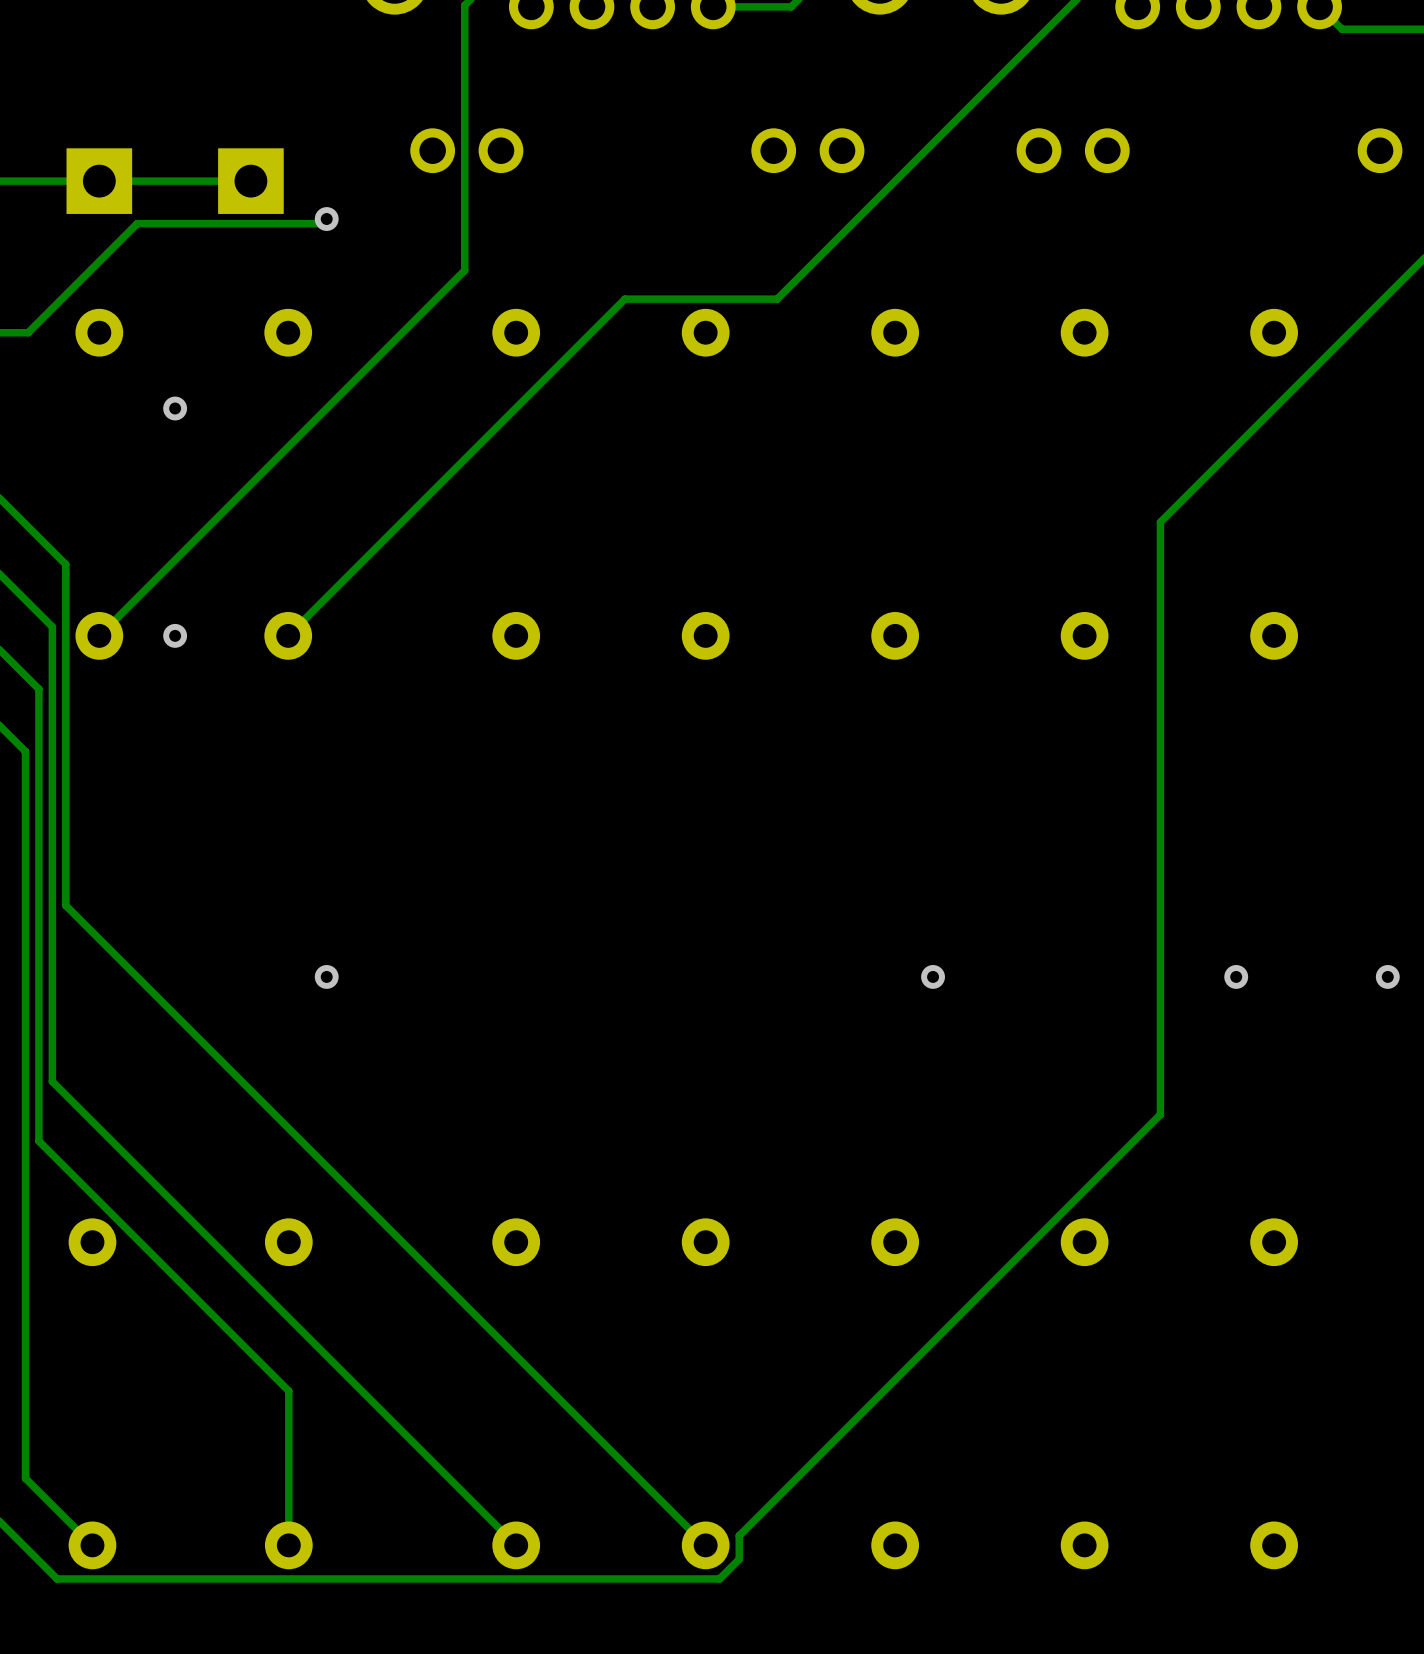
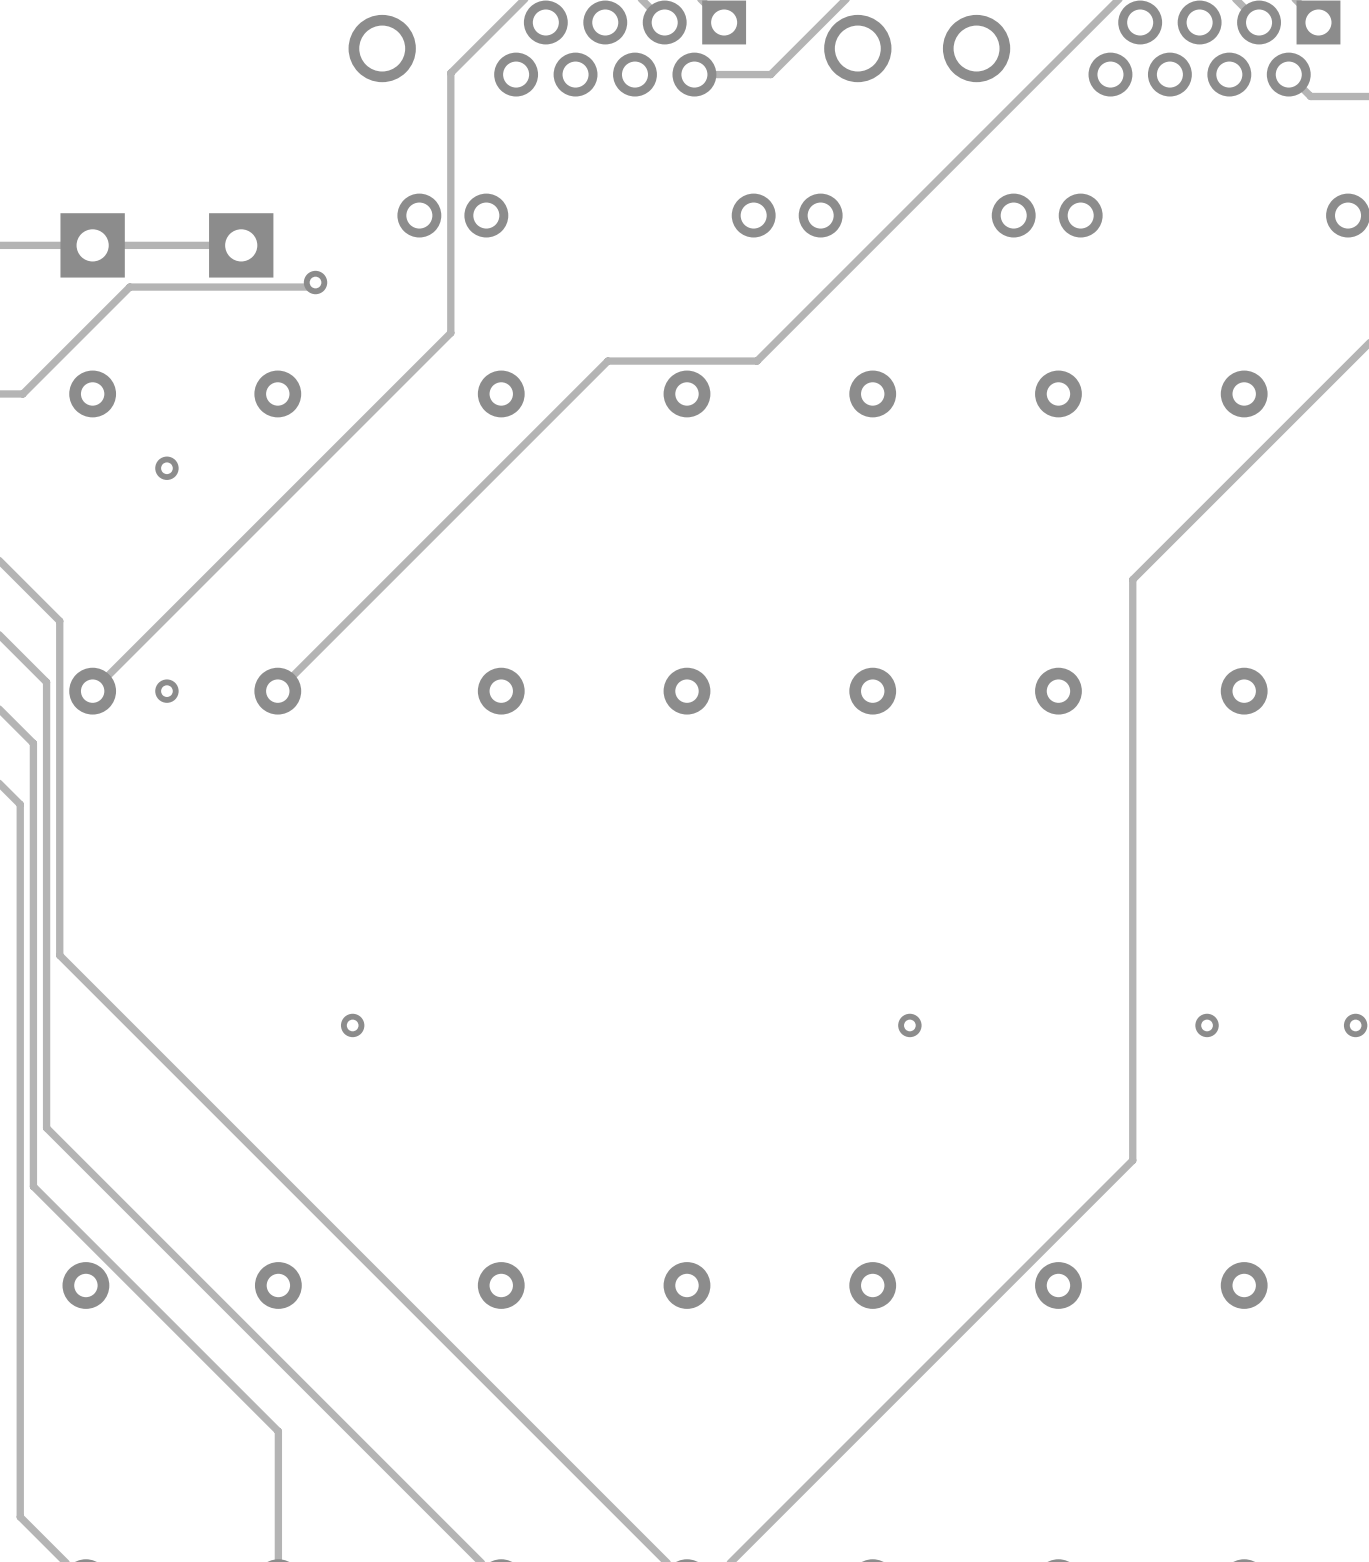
via position: (326, 976) -> (352, 1025)

